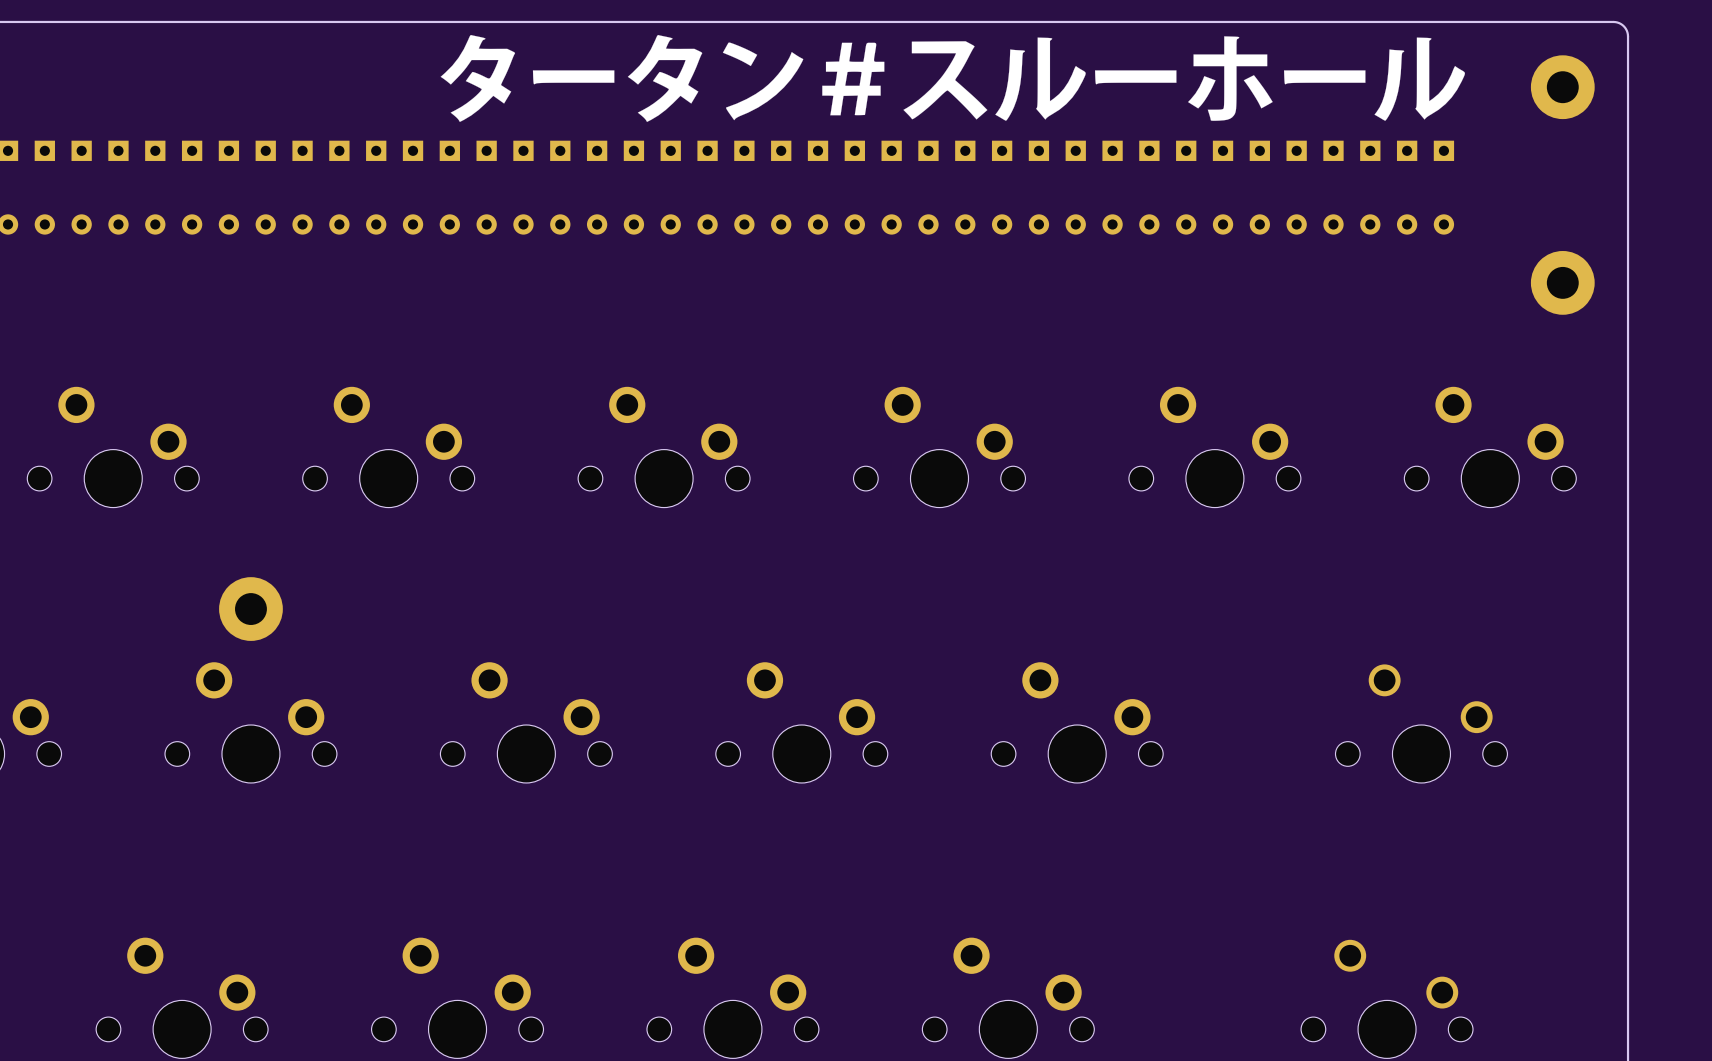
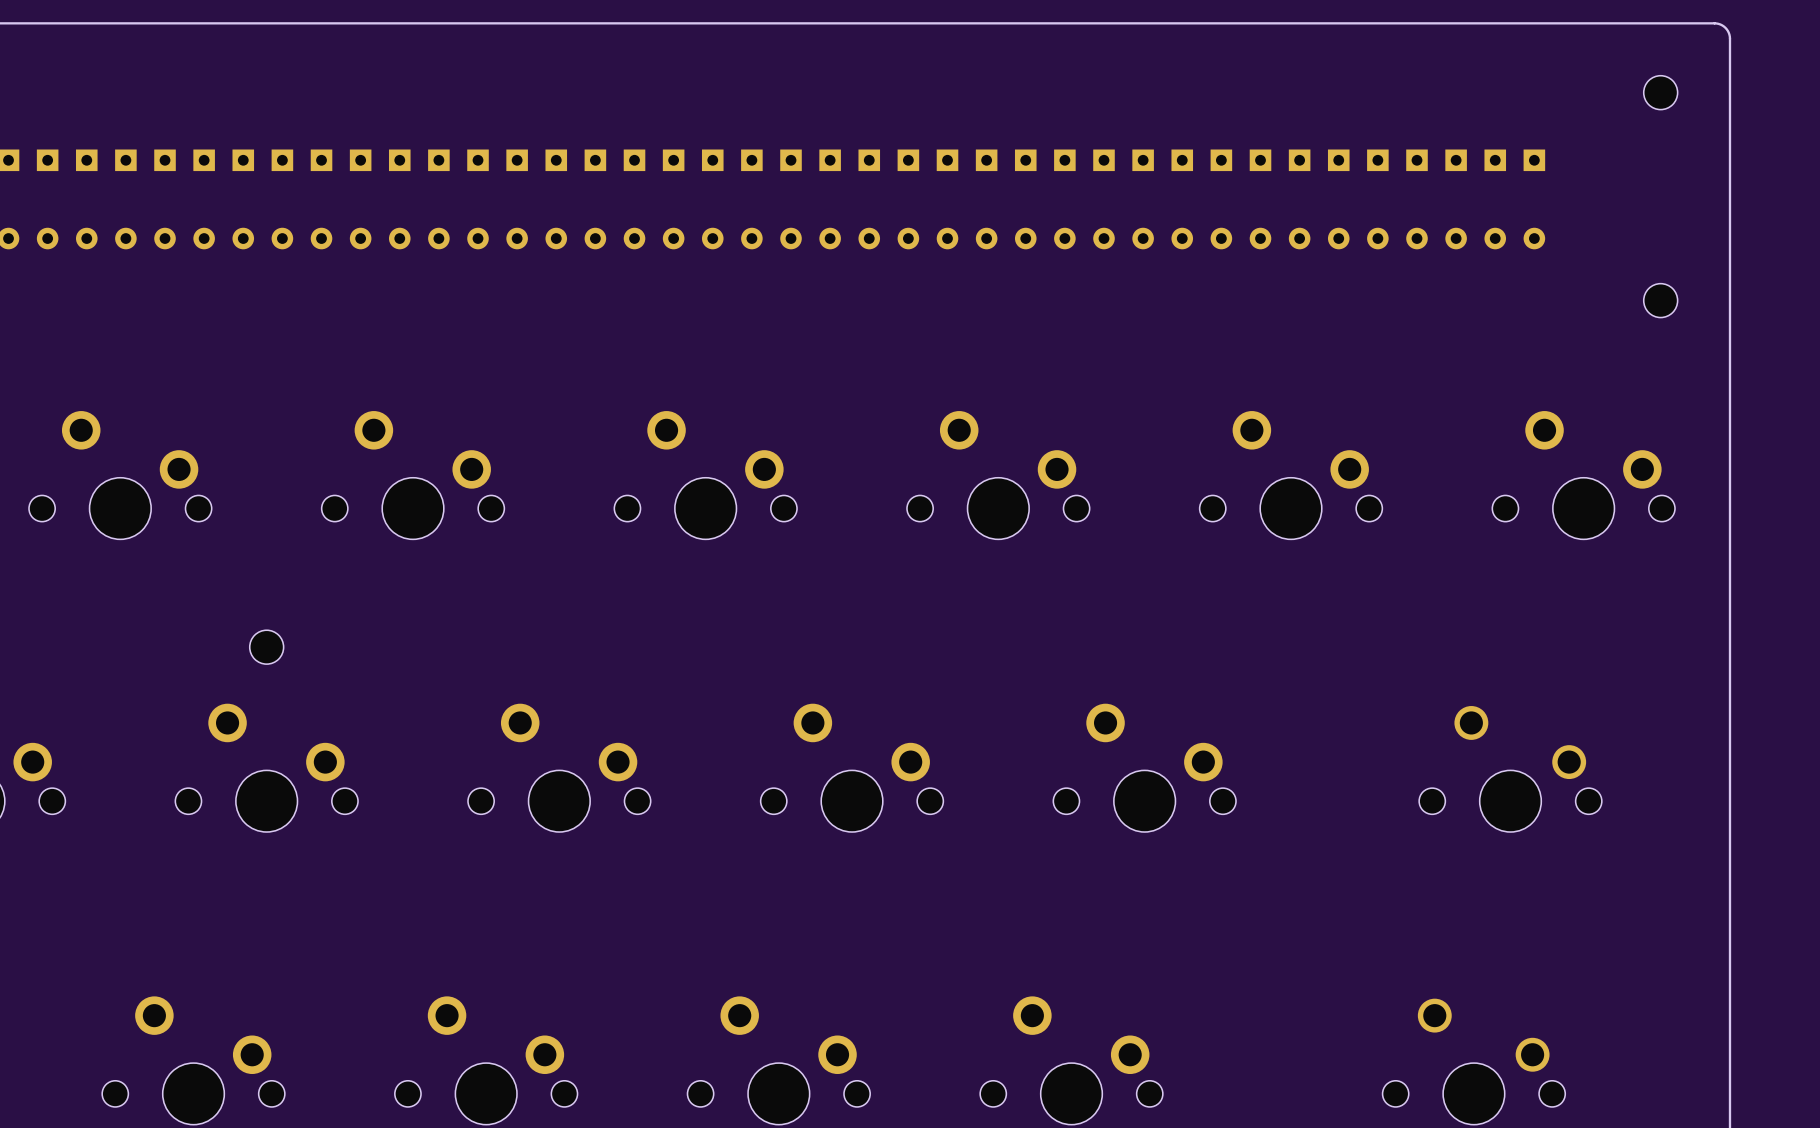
drawing: [440, 34, 1465, 122] -> none
part footprint: [1530, 55, 1595, 120] -> [1643, 75, 1678, 110]
part footprint: [1530, 251, 1595, 315] -> [1643, 283, 1678, 318]
part footprint: [219, 577, 283, 641] -> [249, 630, 284, 665]

